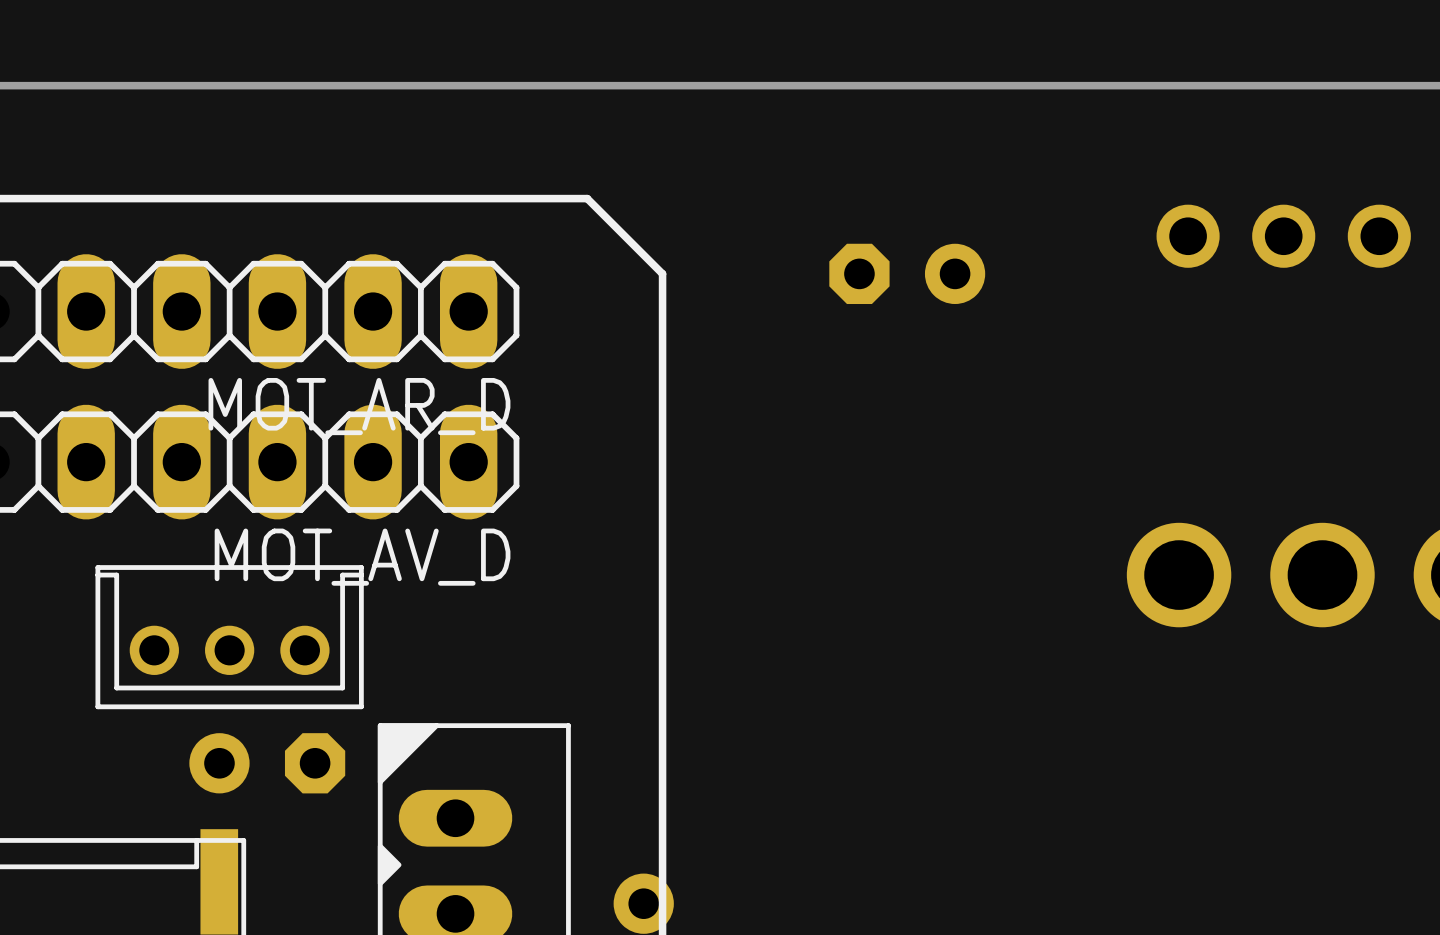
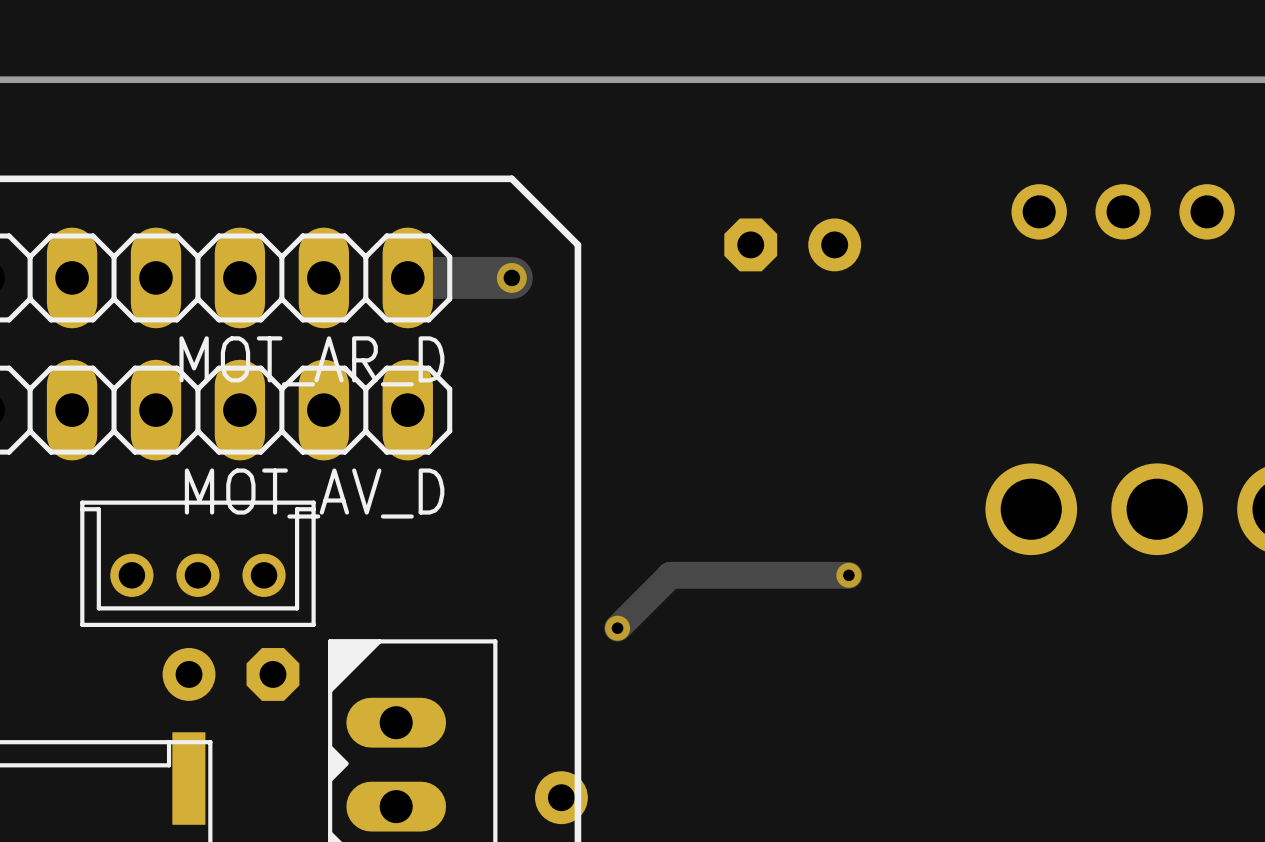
track: none -> (511, 277) (407, 277)
via: none -> (511, 277)
track: none -> (848, 575) (670, 575) (617, 628)
via: none -> (848, 575)
via: none -> (617, 628)

